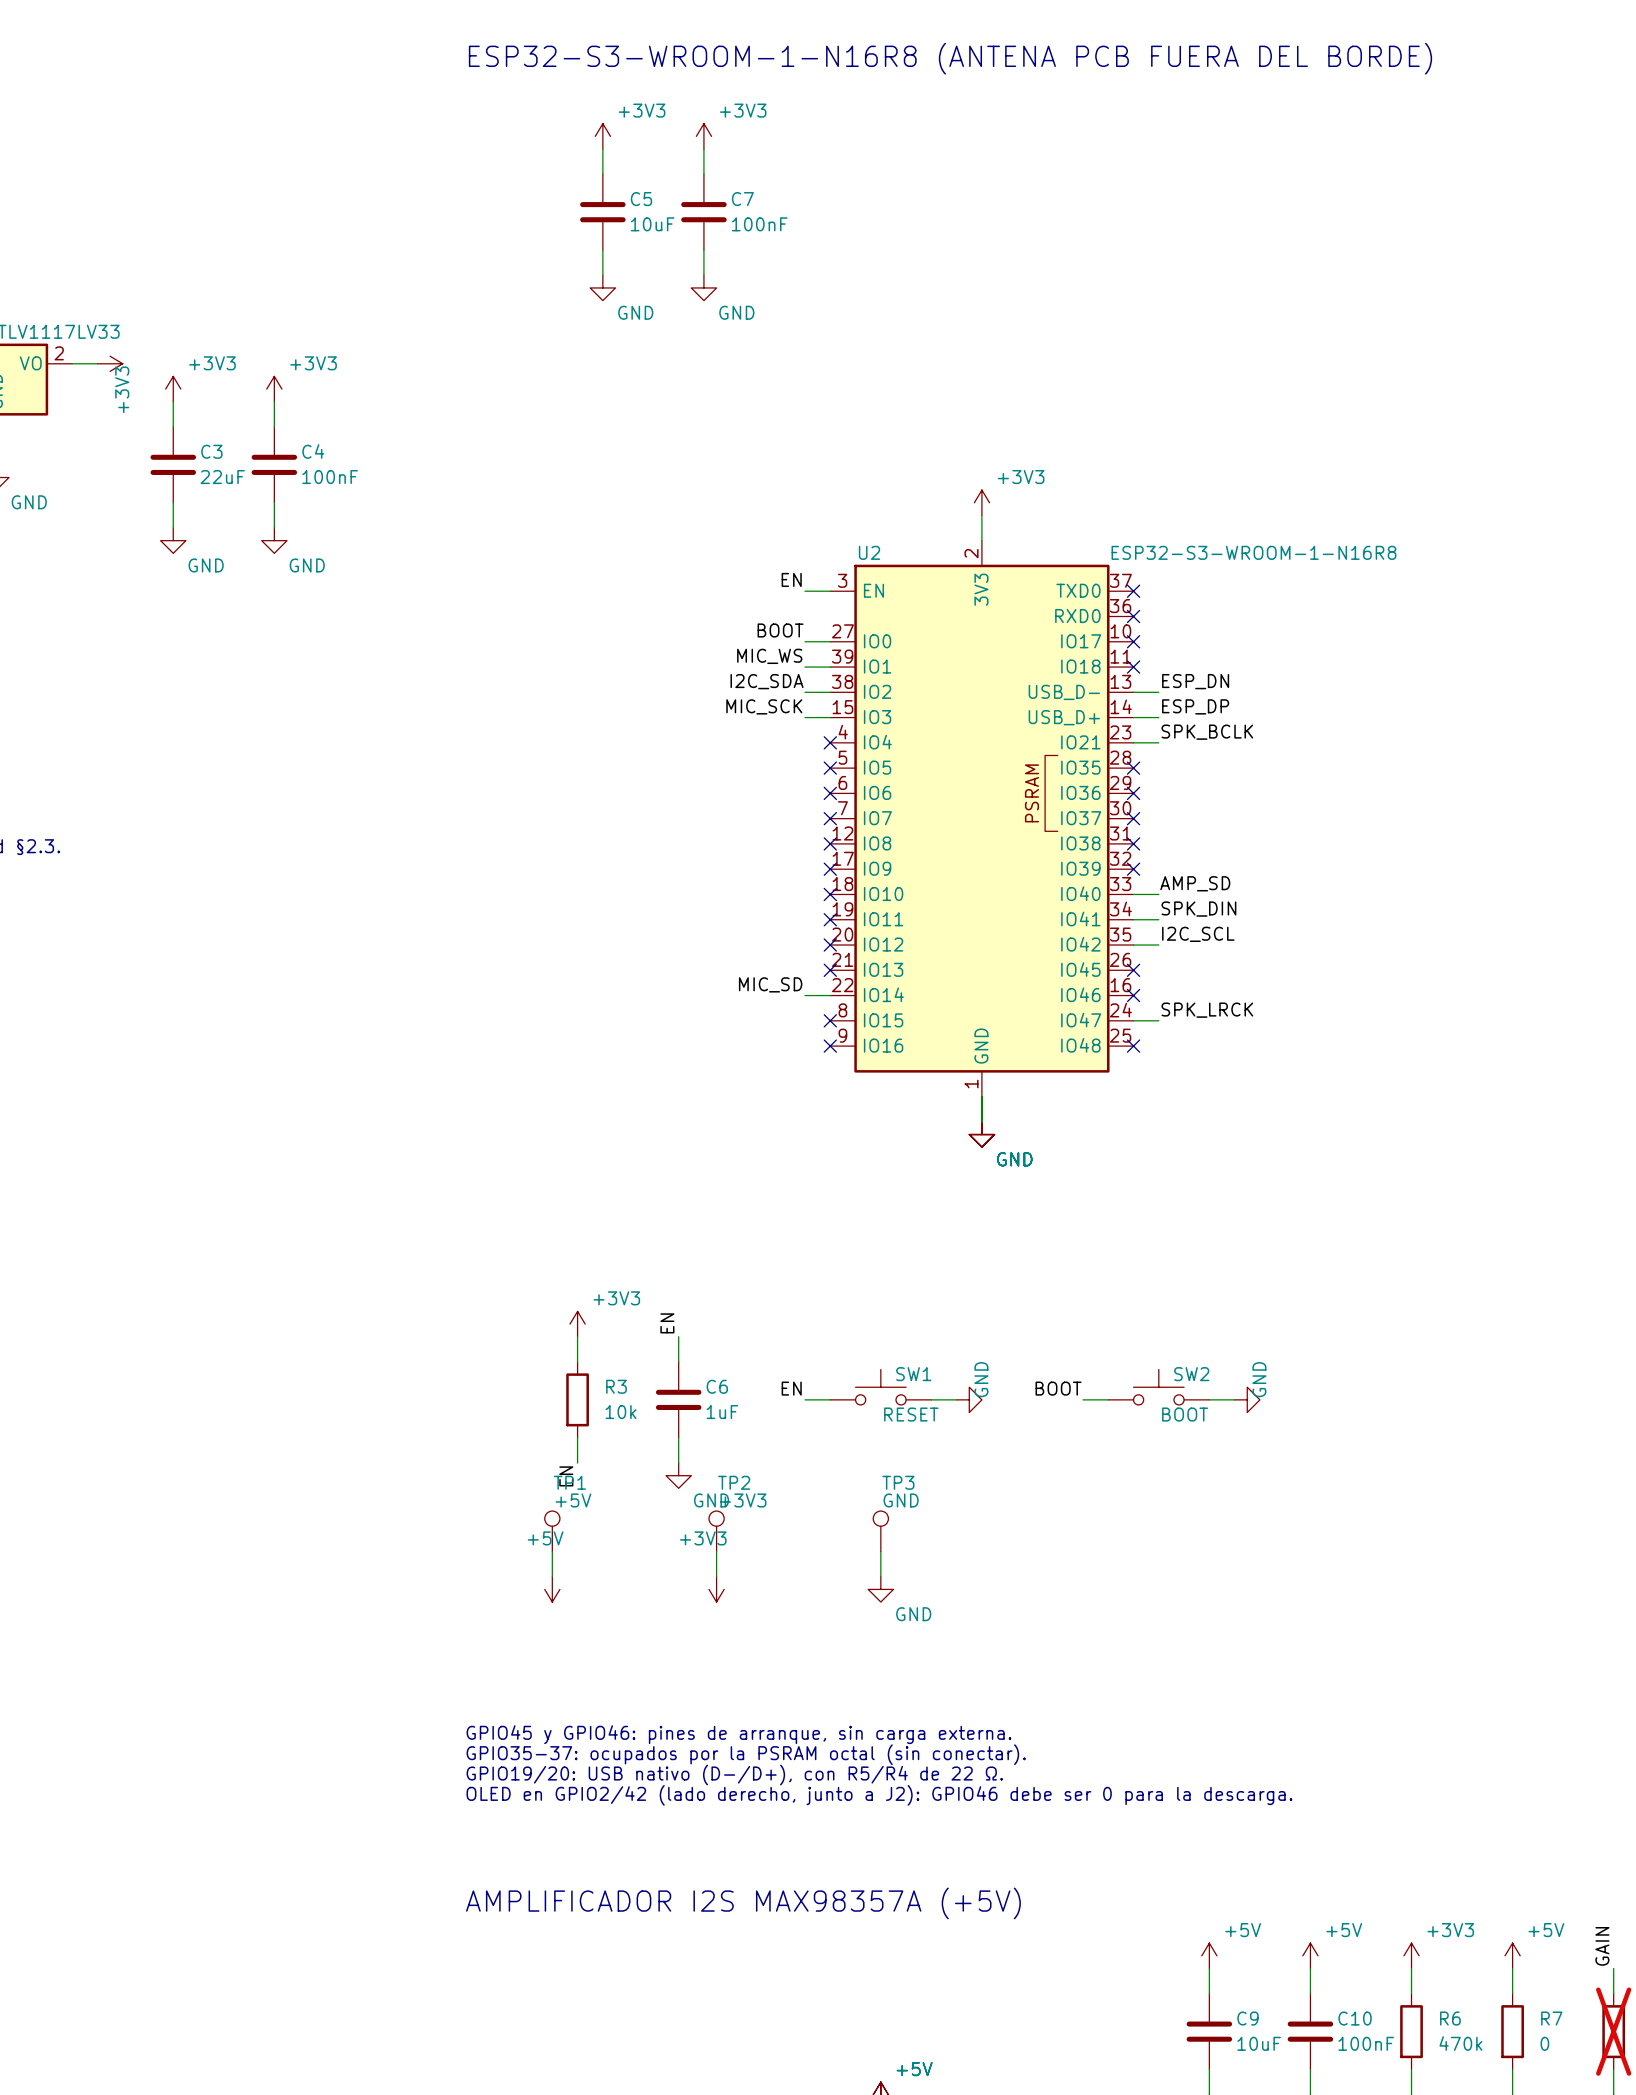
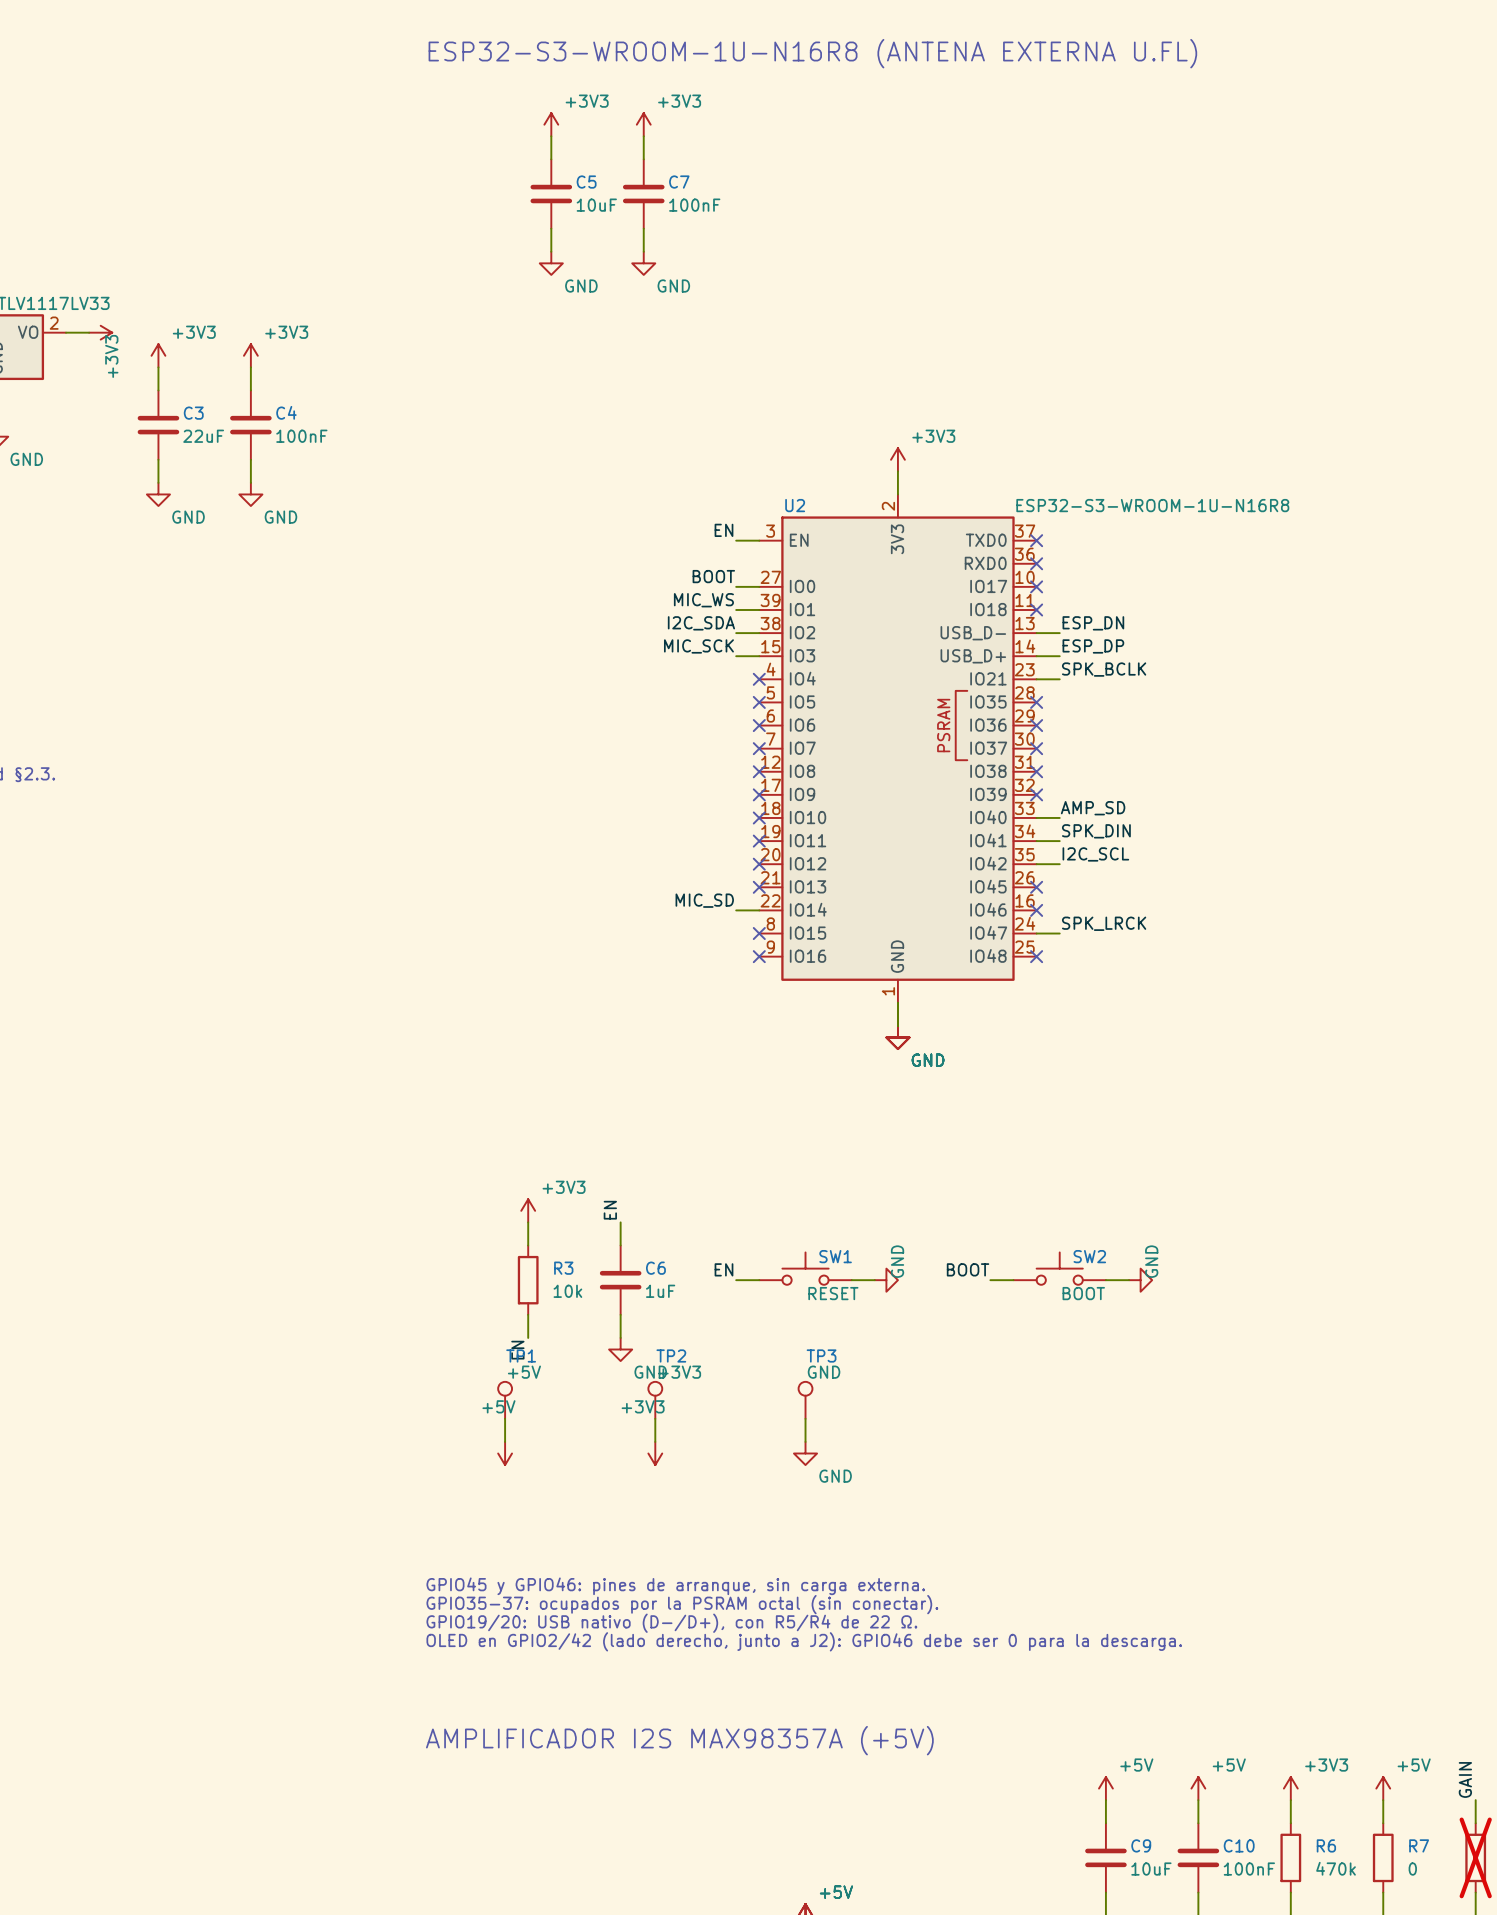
text: ESP32-S3-WROOM-1-N16R8 (ANTENA PCB FUERA DEL BORDE) (950, 58) -> ESP32-S3-WROOM-1U-N16R8 (ANTENA EXTERNA U.FL) (812, 53)
U2 value: ESP32-S3-WROOM-1-N16R8 (1253, 552) -> ESP32-S3-WROOM-1U-N16R8 (1152, 505)

